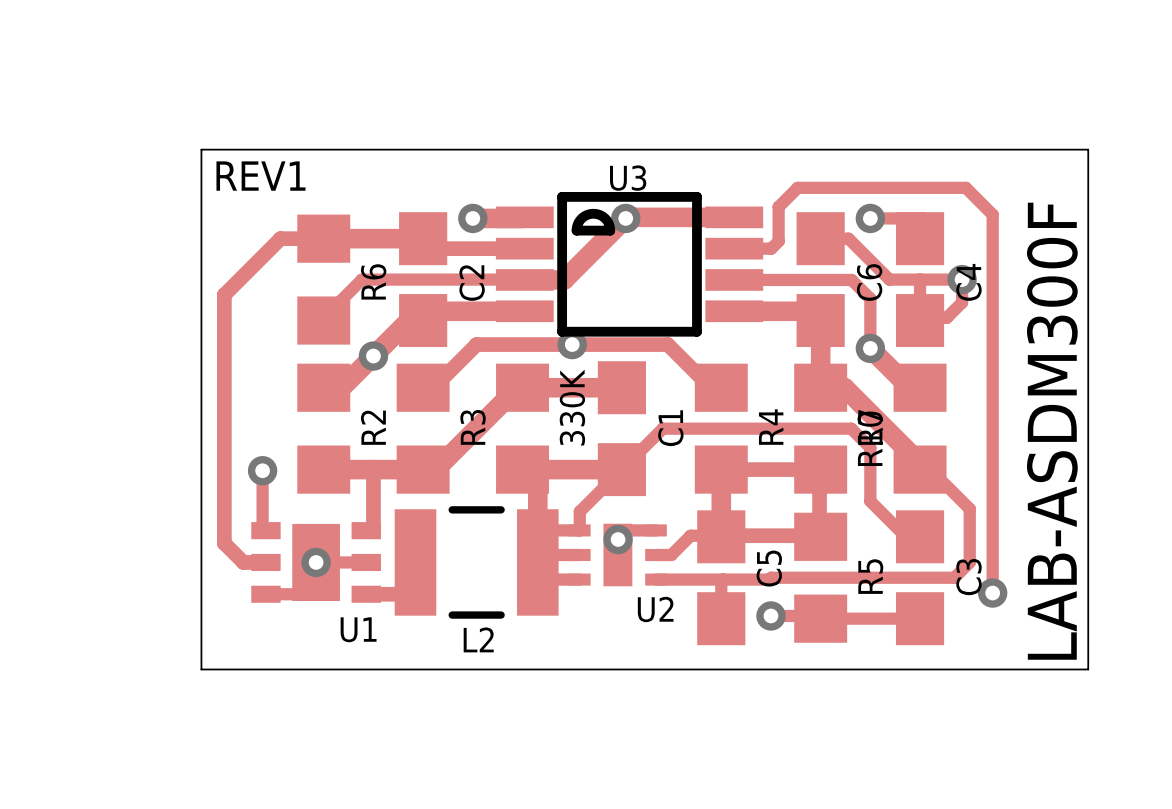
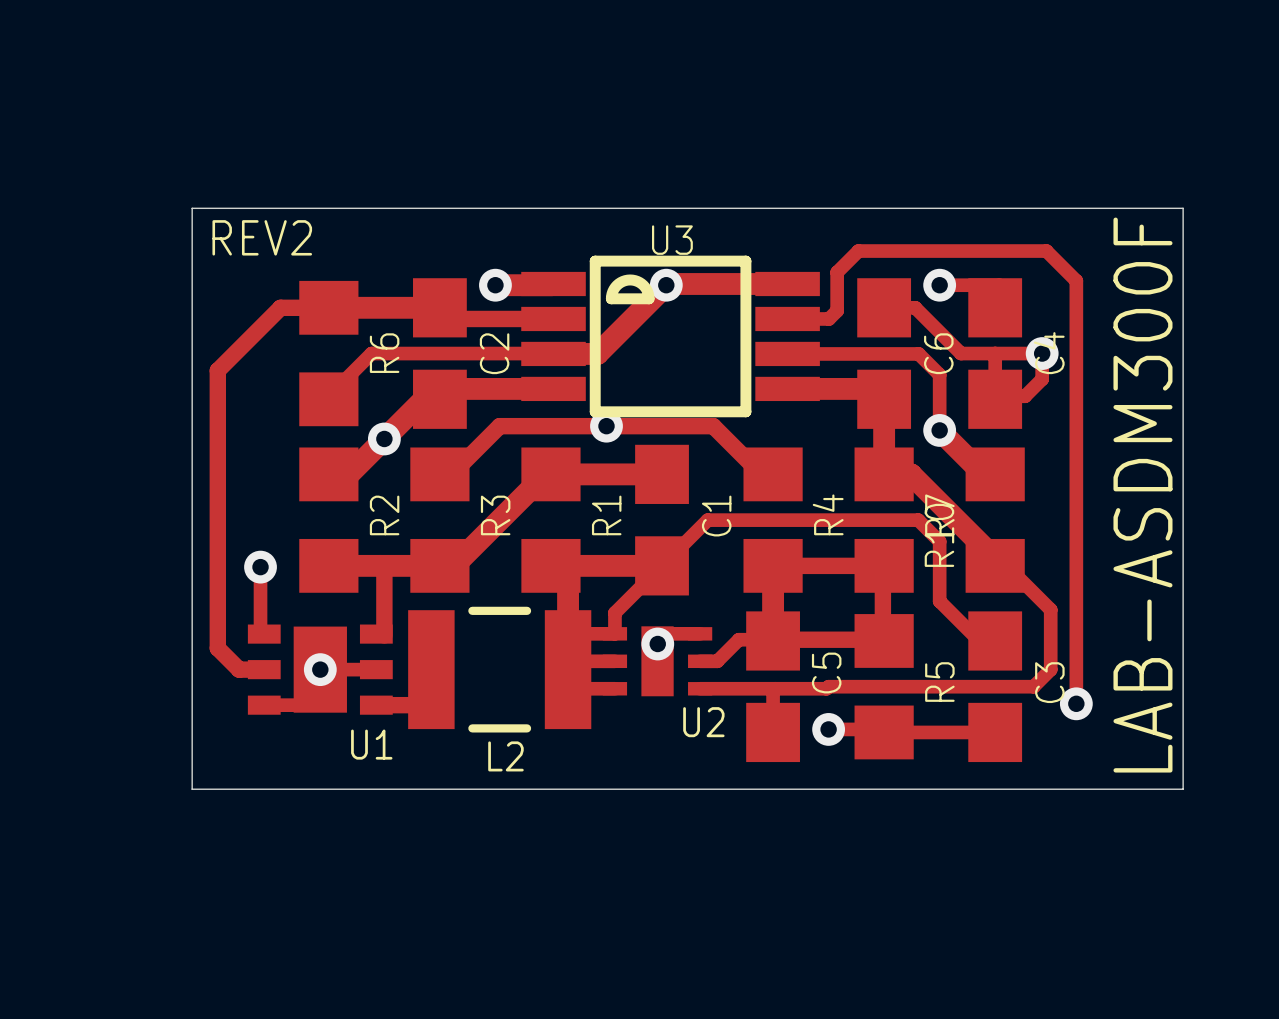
text: REV1 (260, 176) -> REV2 (262, 237)
330K name: 330K (572, 407) -> R1 (606, 515)

